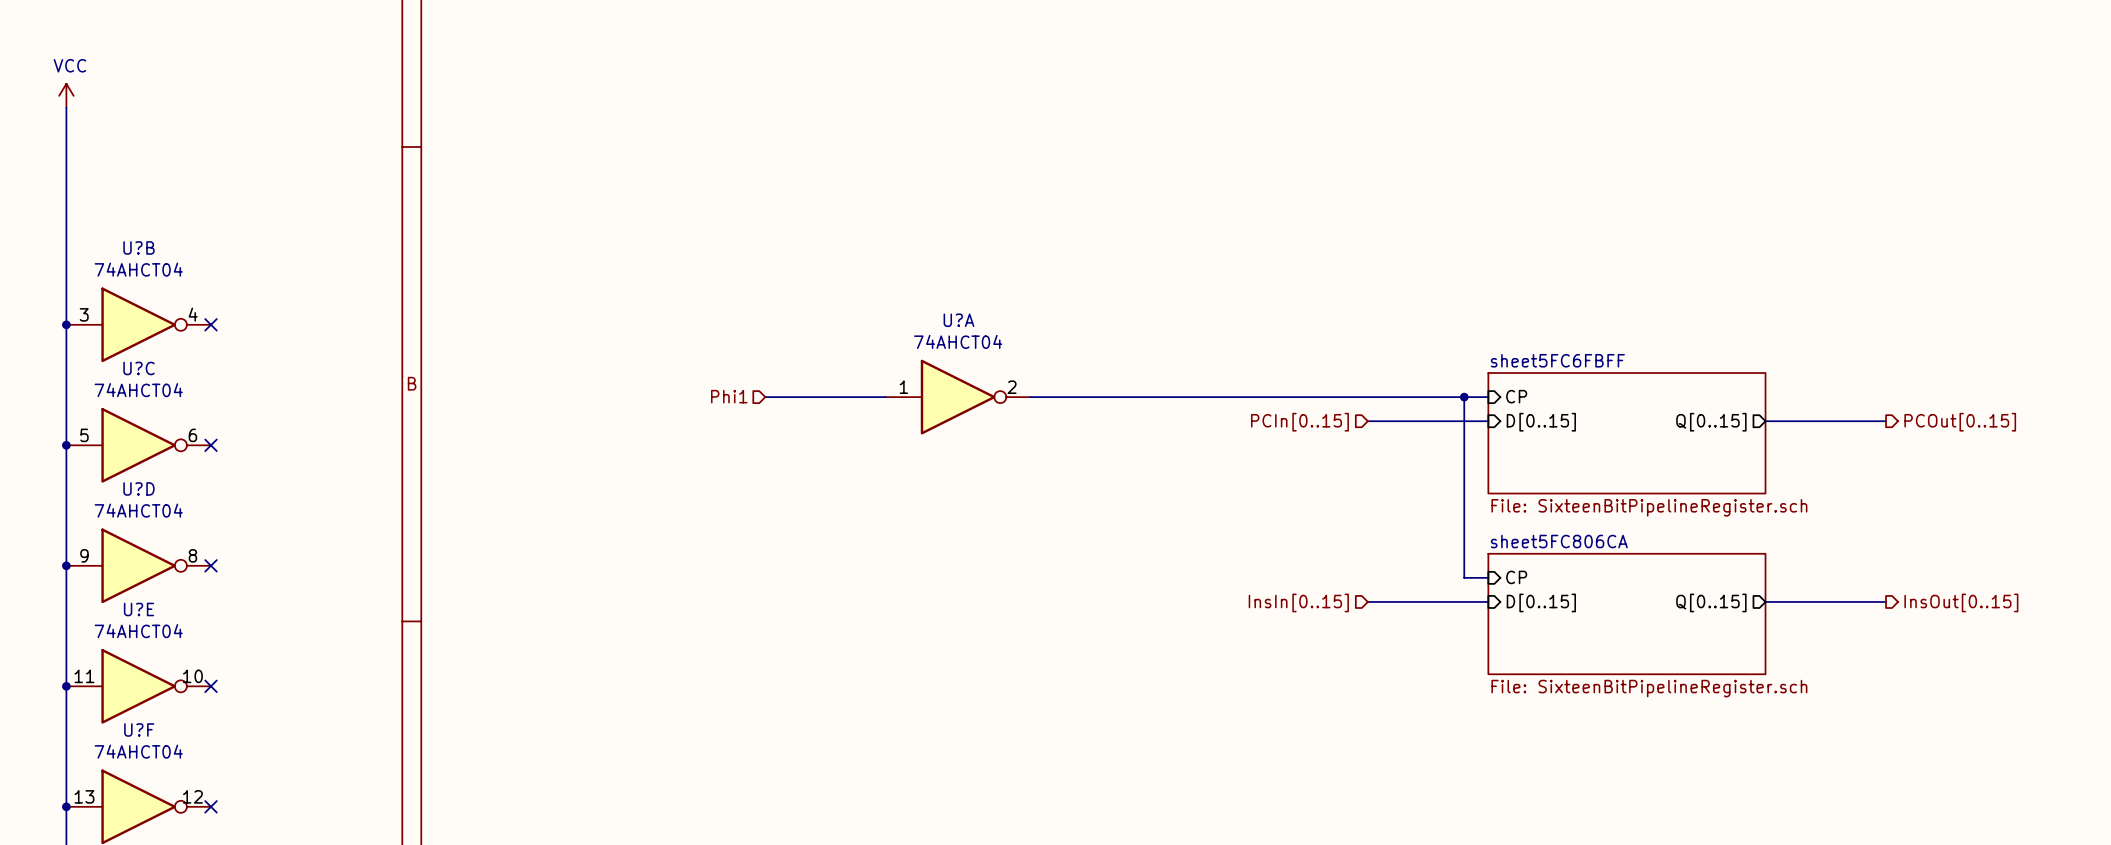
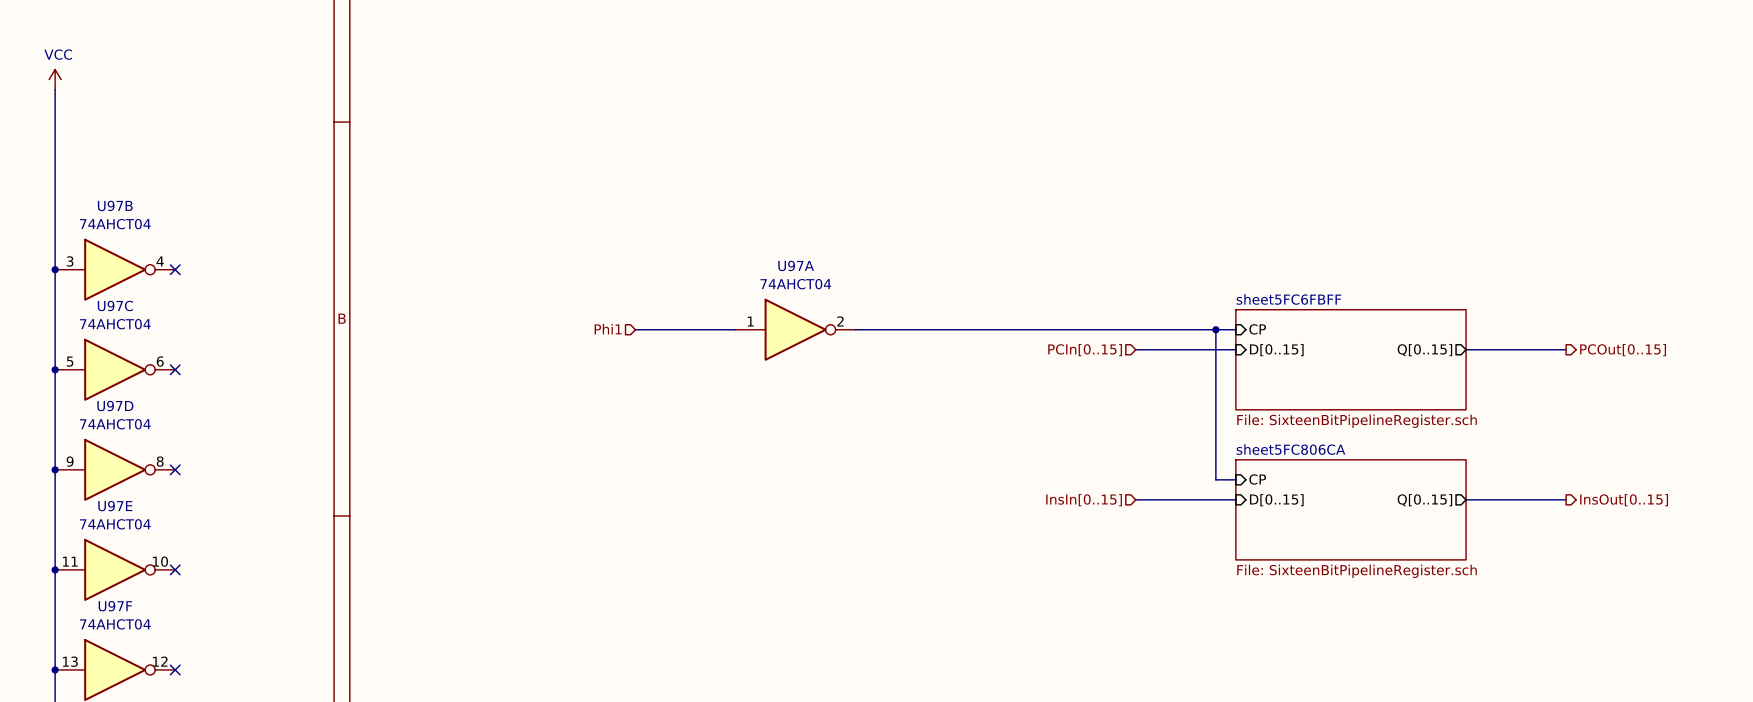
U?B name: U?B (138, 247) -> U97B (115, 205)
U?A name: U?A (959, 320) -> U97A (796, 265)
U?C name: U?C (138, 368) -> U97C (115, 305)
U?D name: U?D (138, 488) -> U97D (115, 406)
U?E name: U?E (138, 609) -> U97E (115, 506)
U?F name: U?F (139, 729) -> U97F (115, 606)

